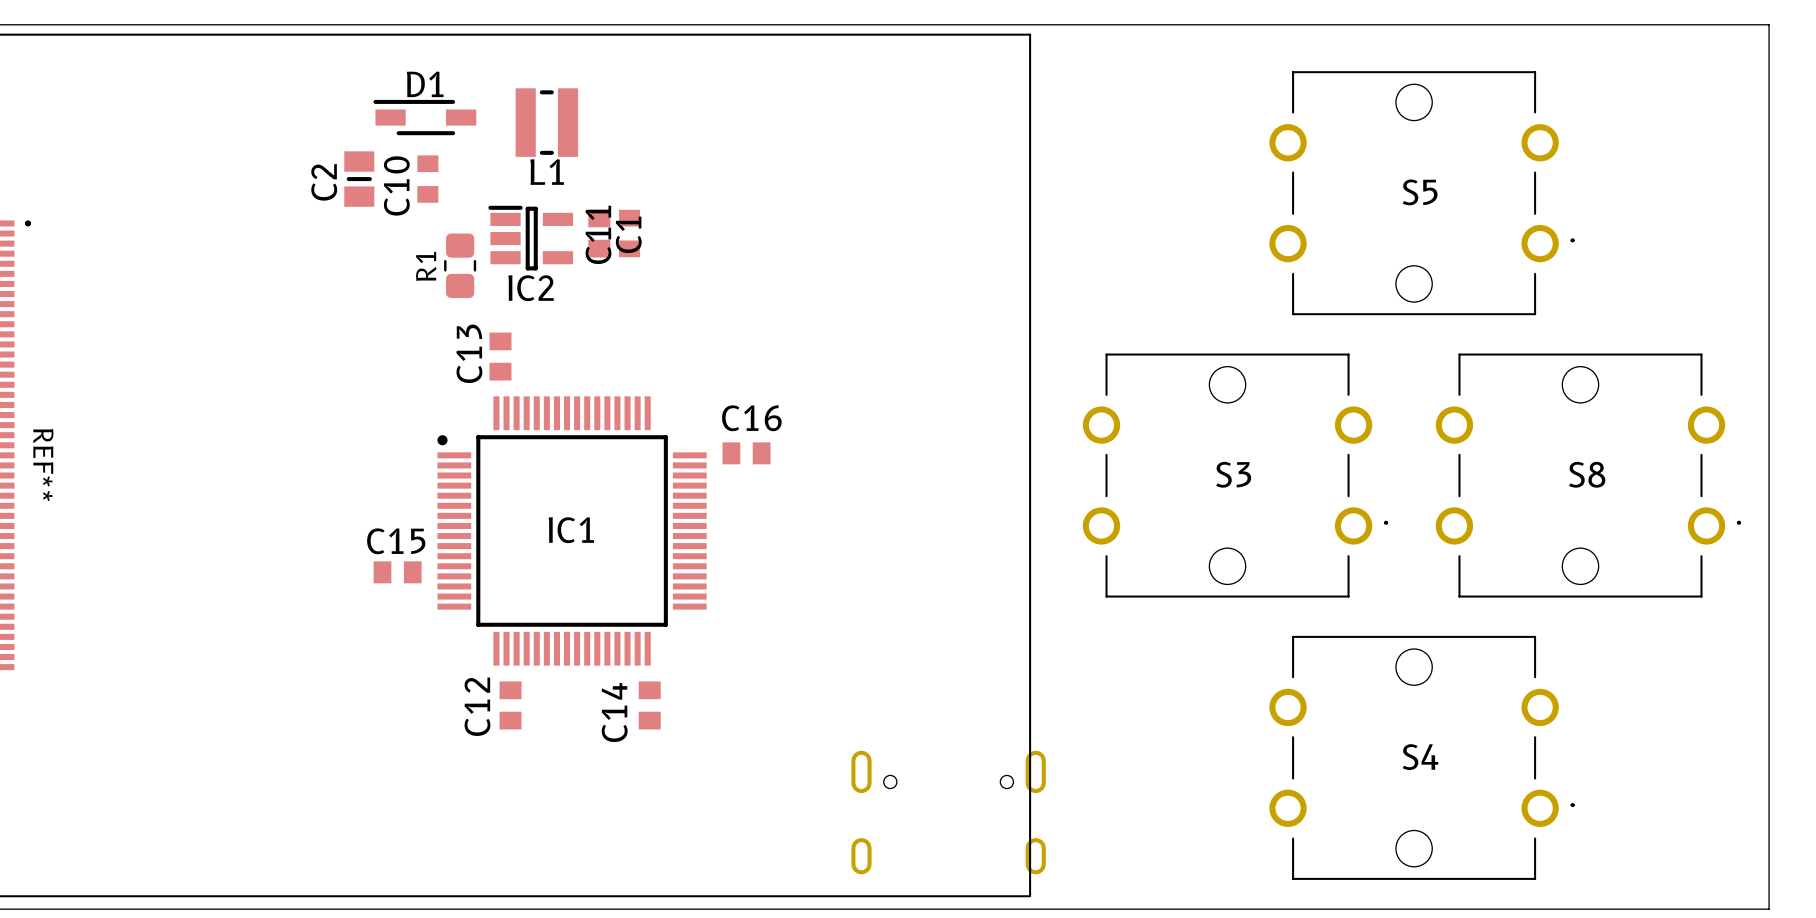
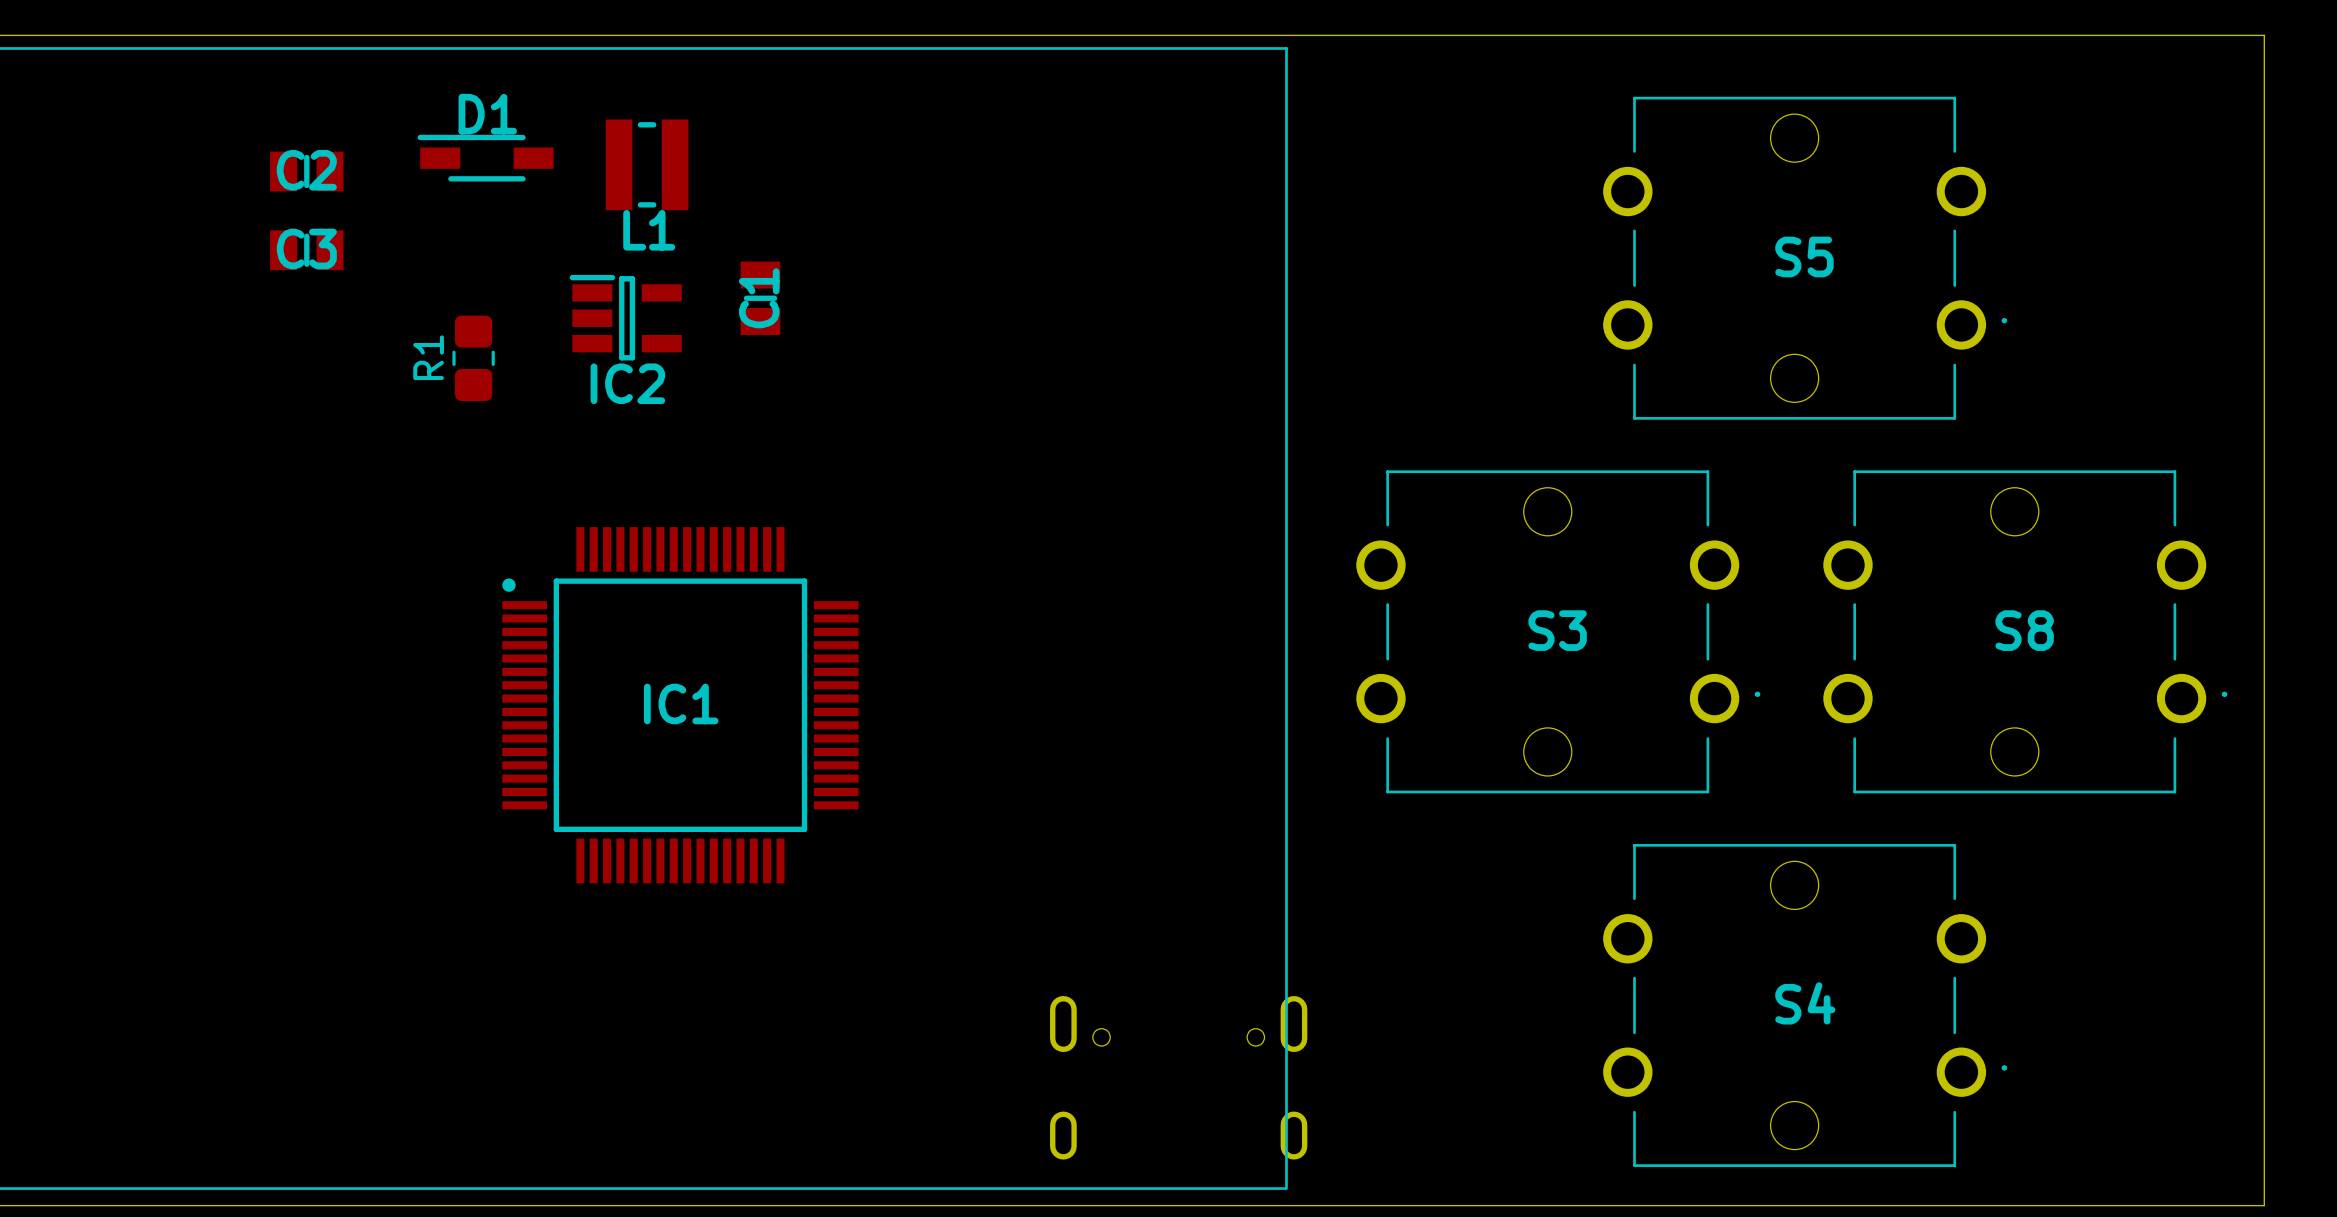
C2 rotation: 0° (359, 179) -> 90° clockwise (306, 171)
C2 position: (359, 179) -> (306, 171)
C10: (427, 179) -> none
C3: none -> (306, 250)
C1 footprint: [619, 209, 641, 258] -> [740, 261, 781, 335]
C11: (599, 233) -> none
R1 position: (460, 265) -> (473, 358)
C13: (500, 356) -> none
C16: (746, 453) -> none
C15: (397, 572) -> none
C12: (510, 705) -> none
C14: (649, 705) -> none

